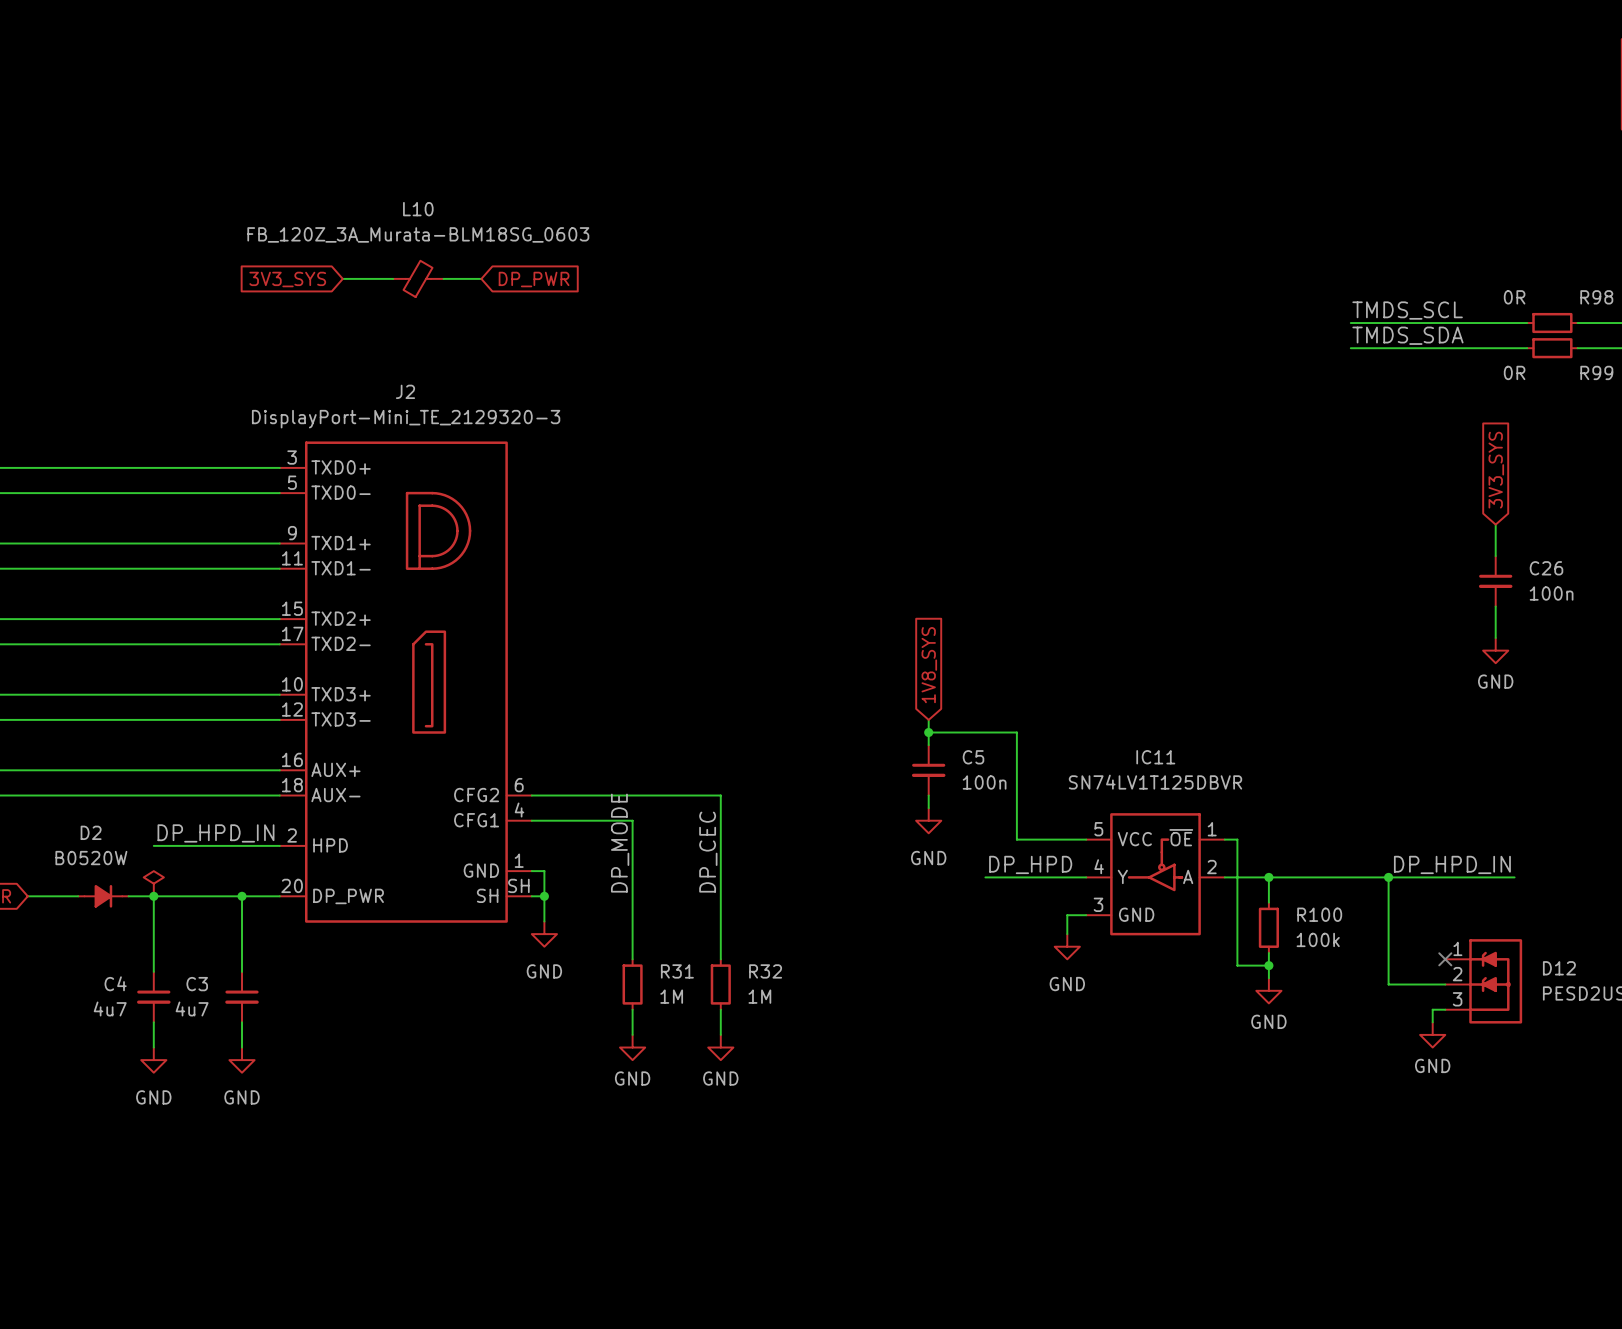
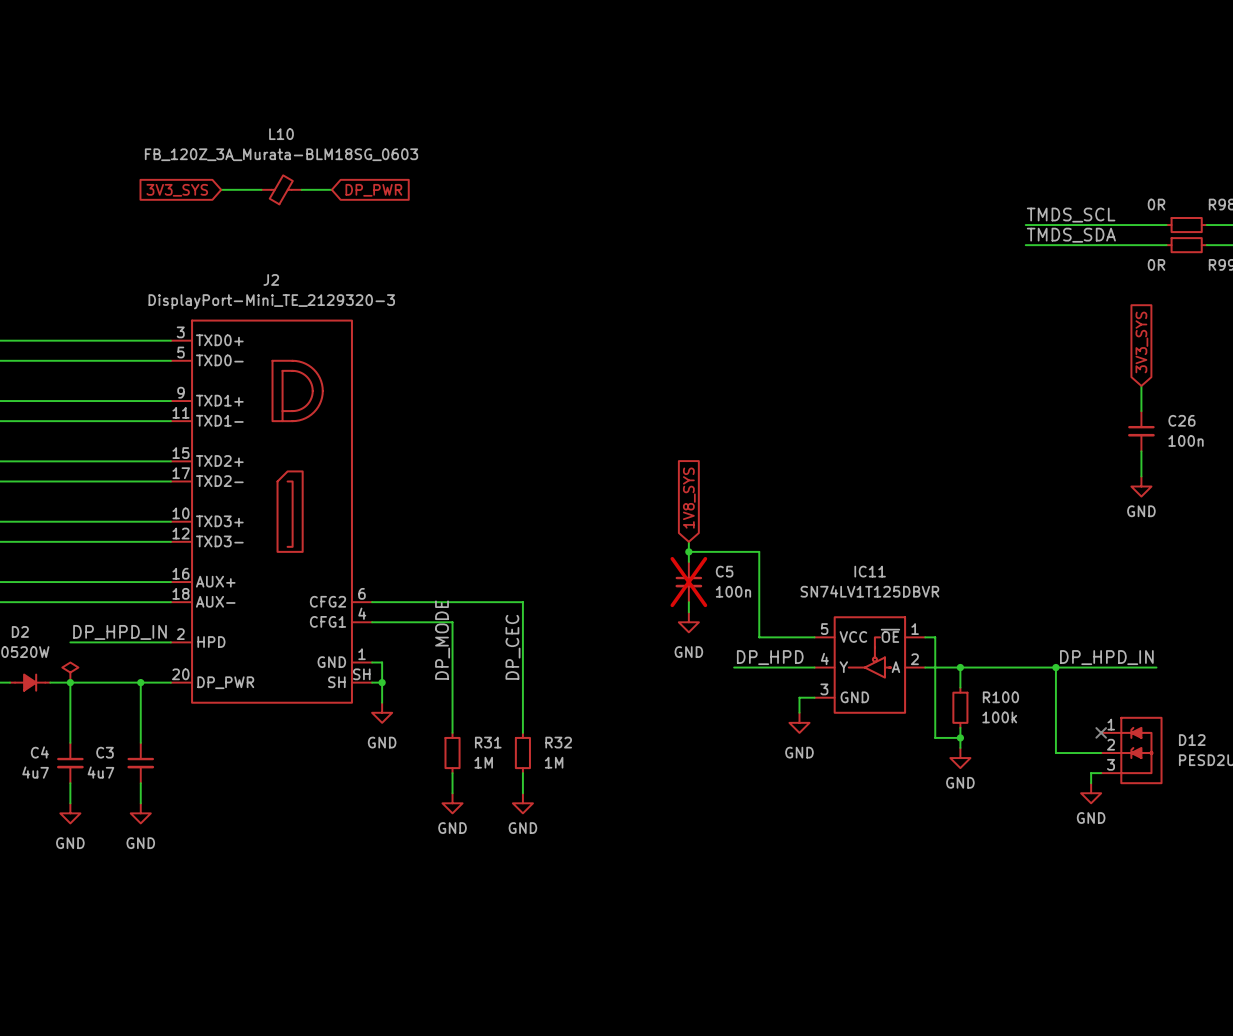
C5 do-not-place cross: none -> (688, 582)

